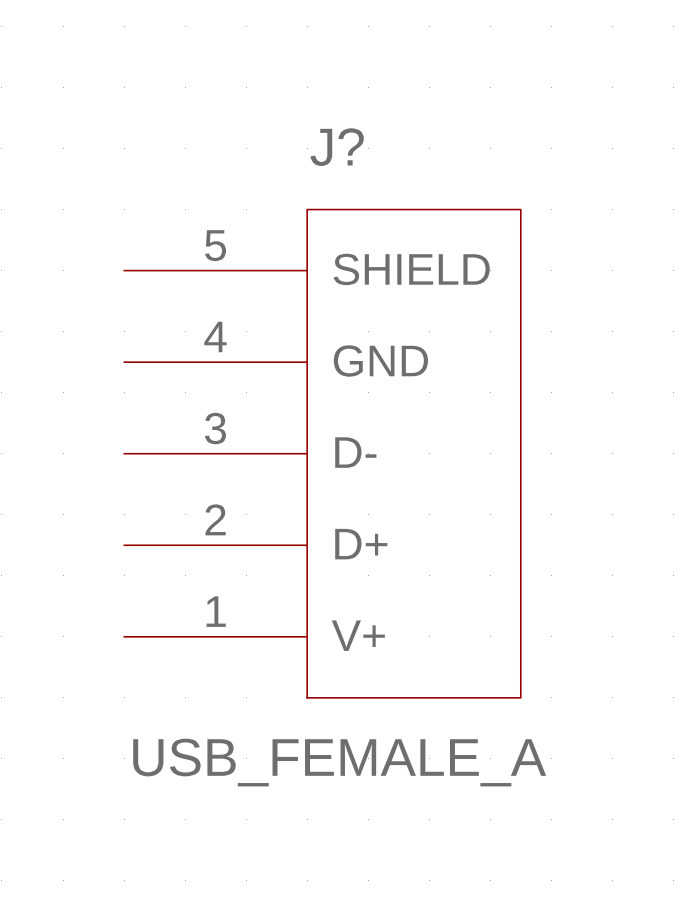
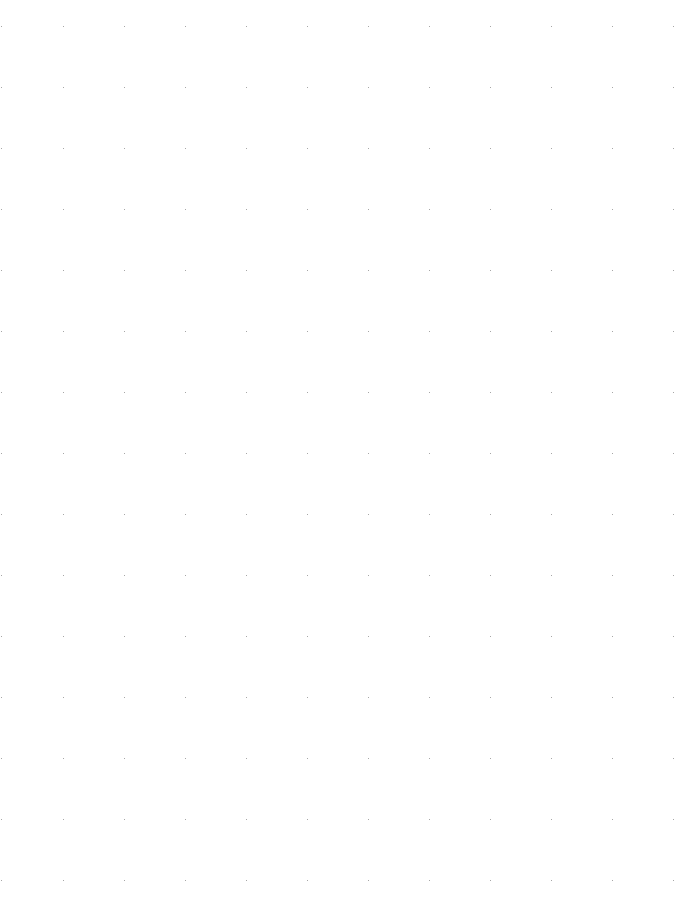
J?: USB_FEMALE_A (322, 453) -> none

